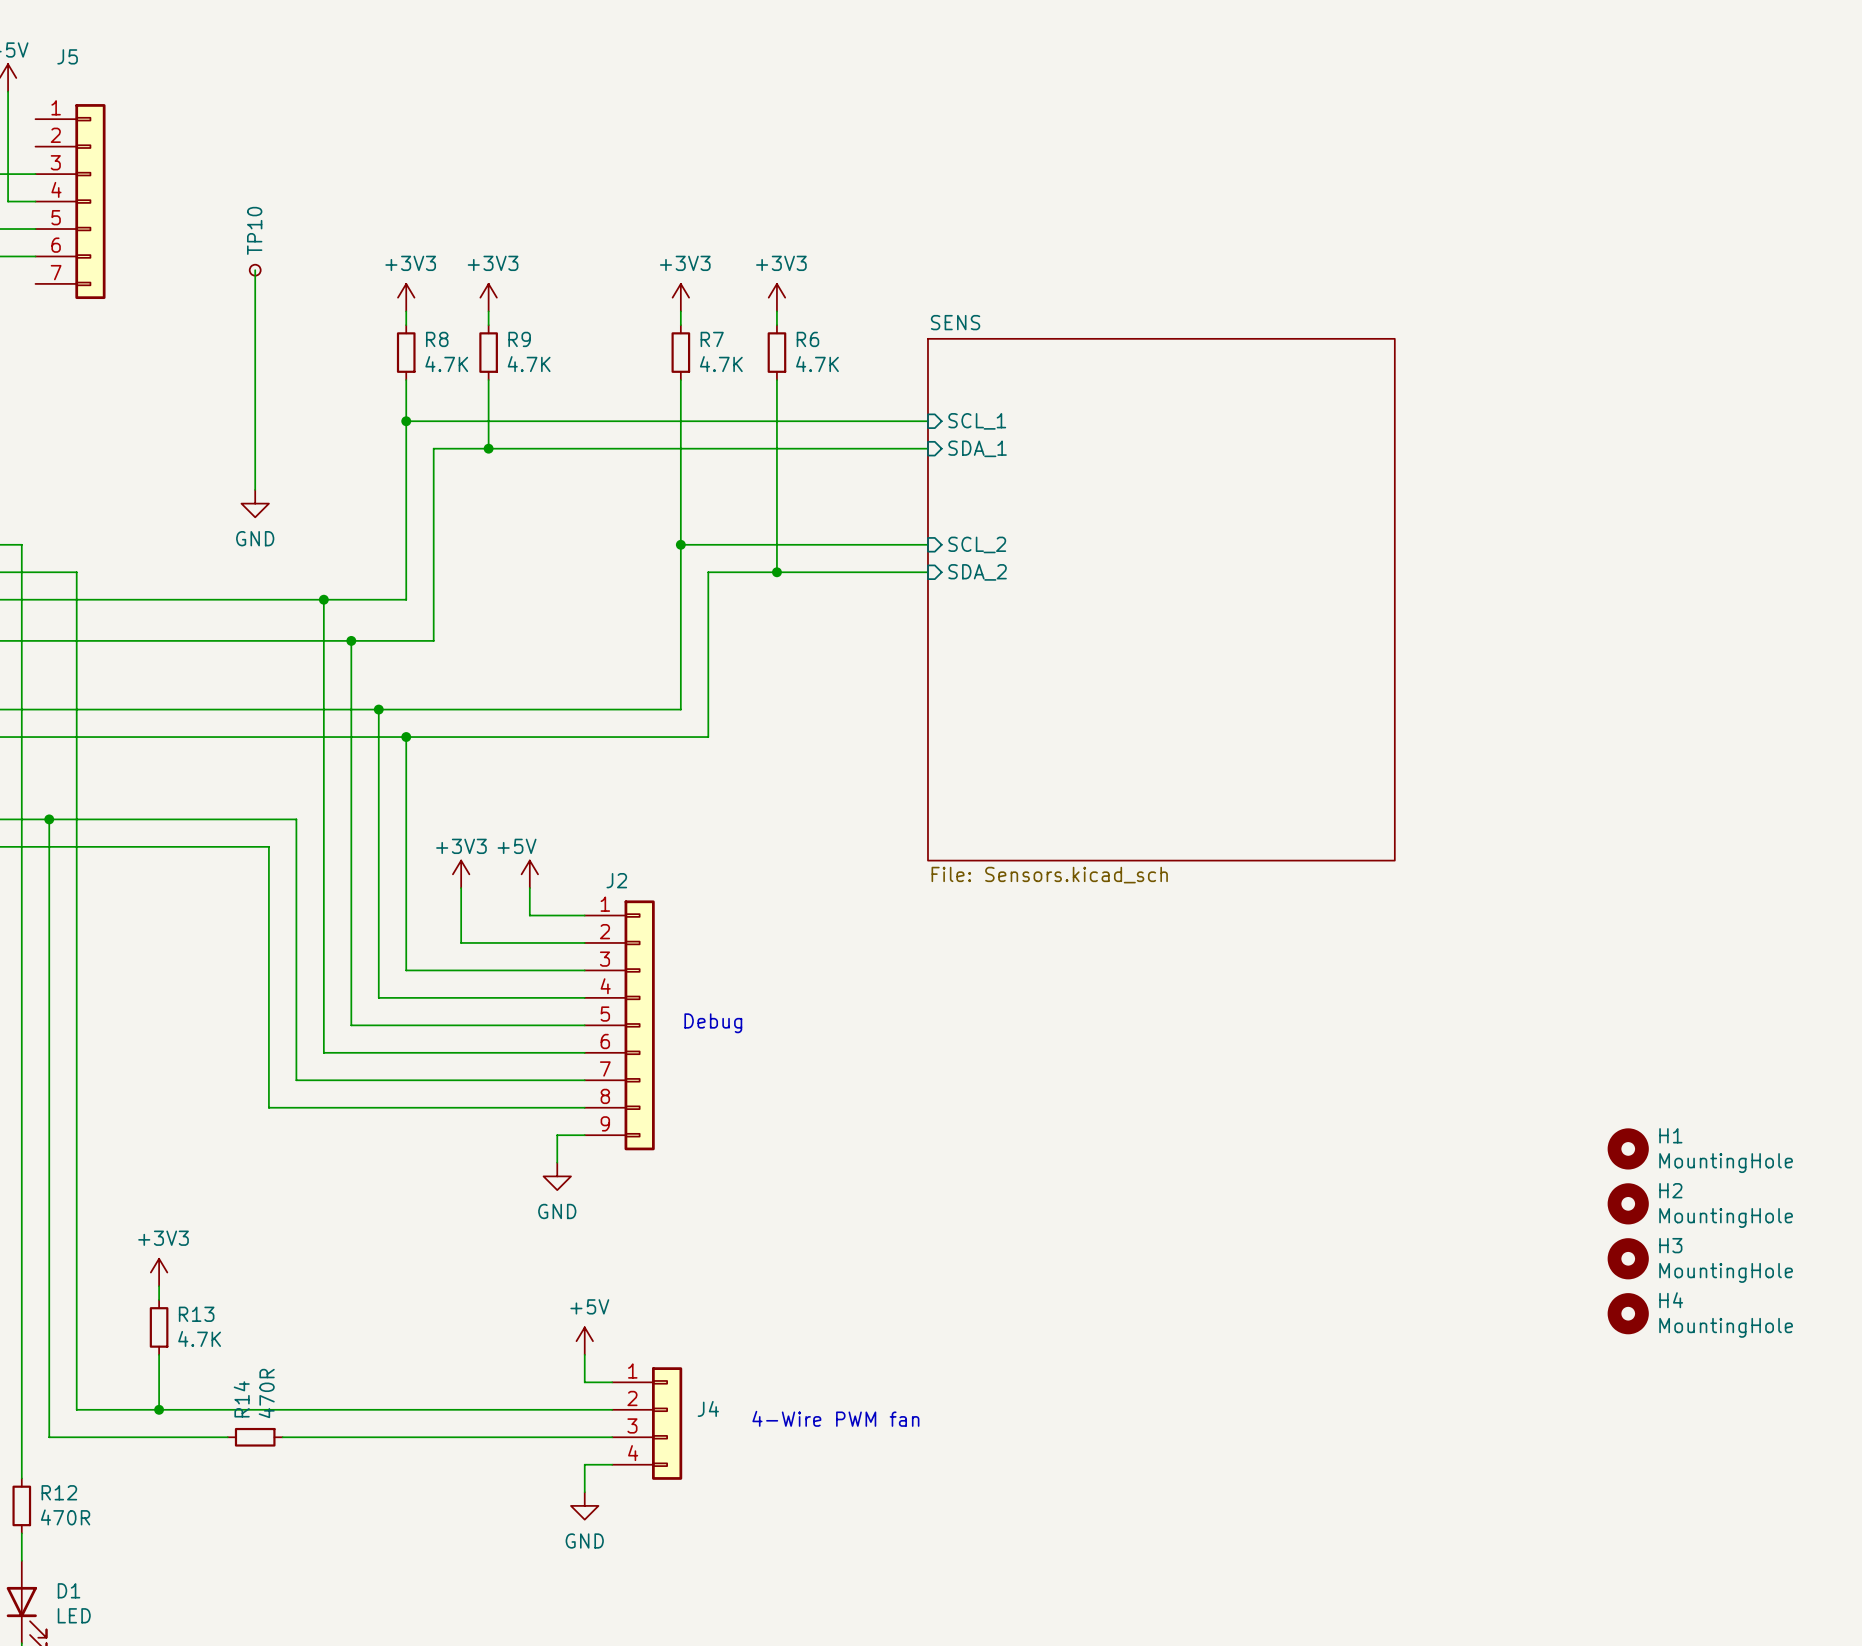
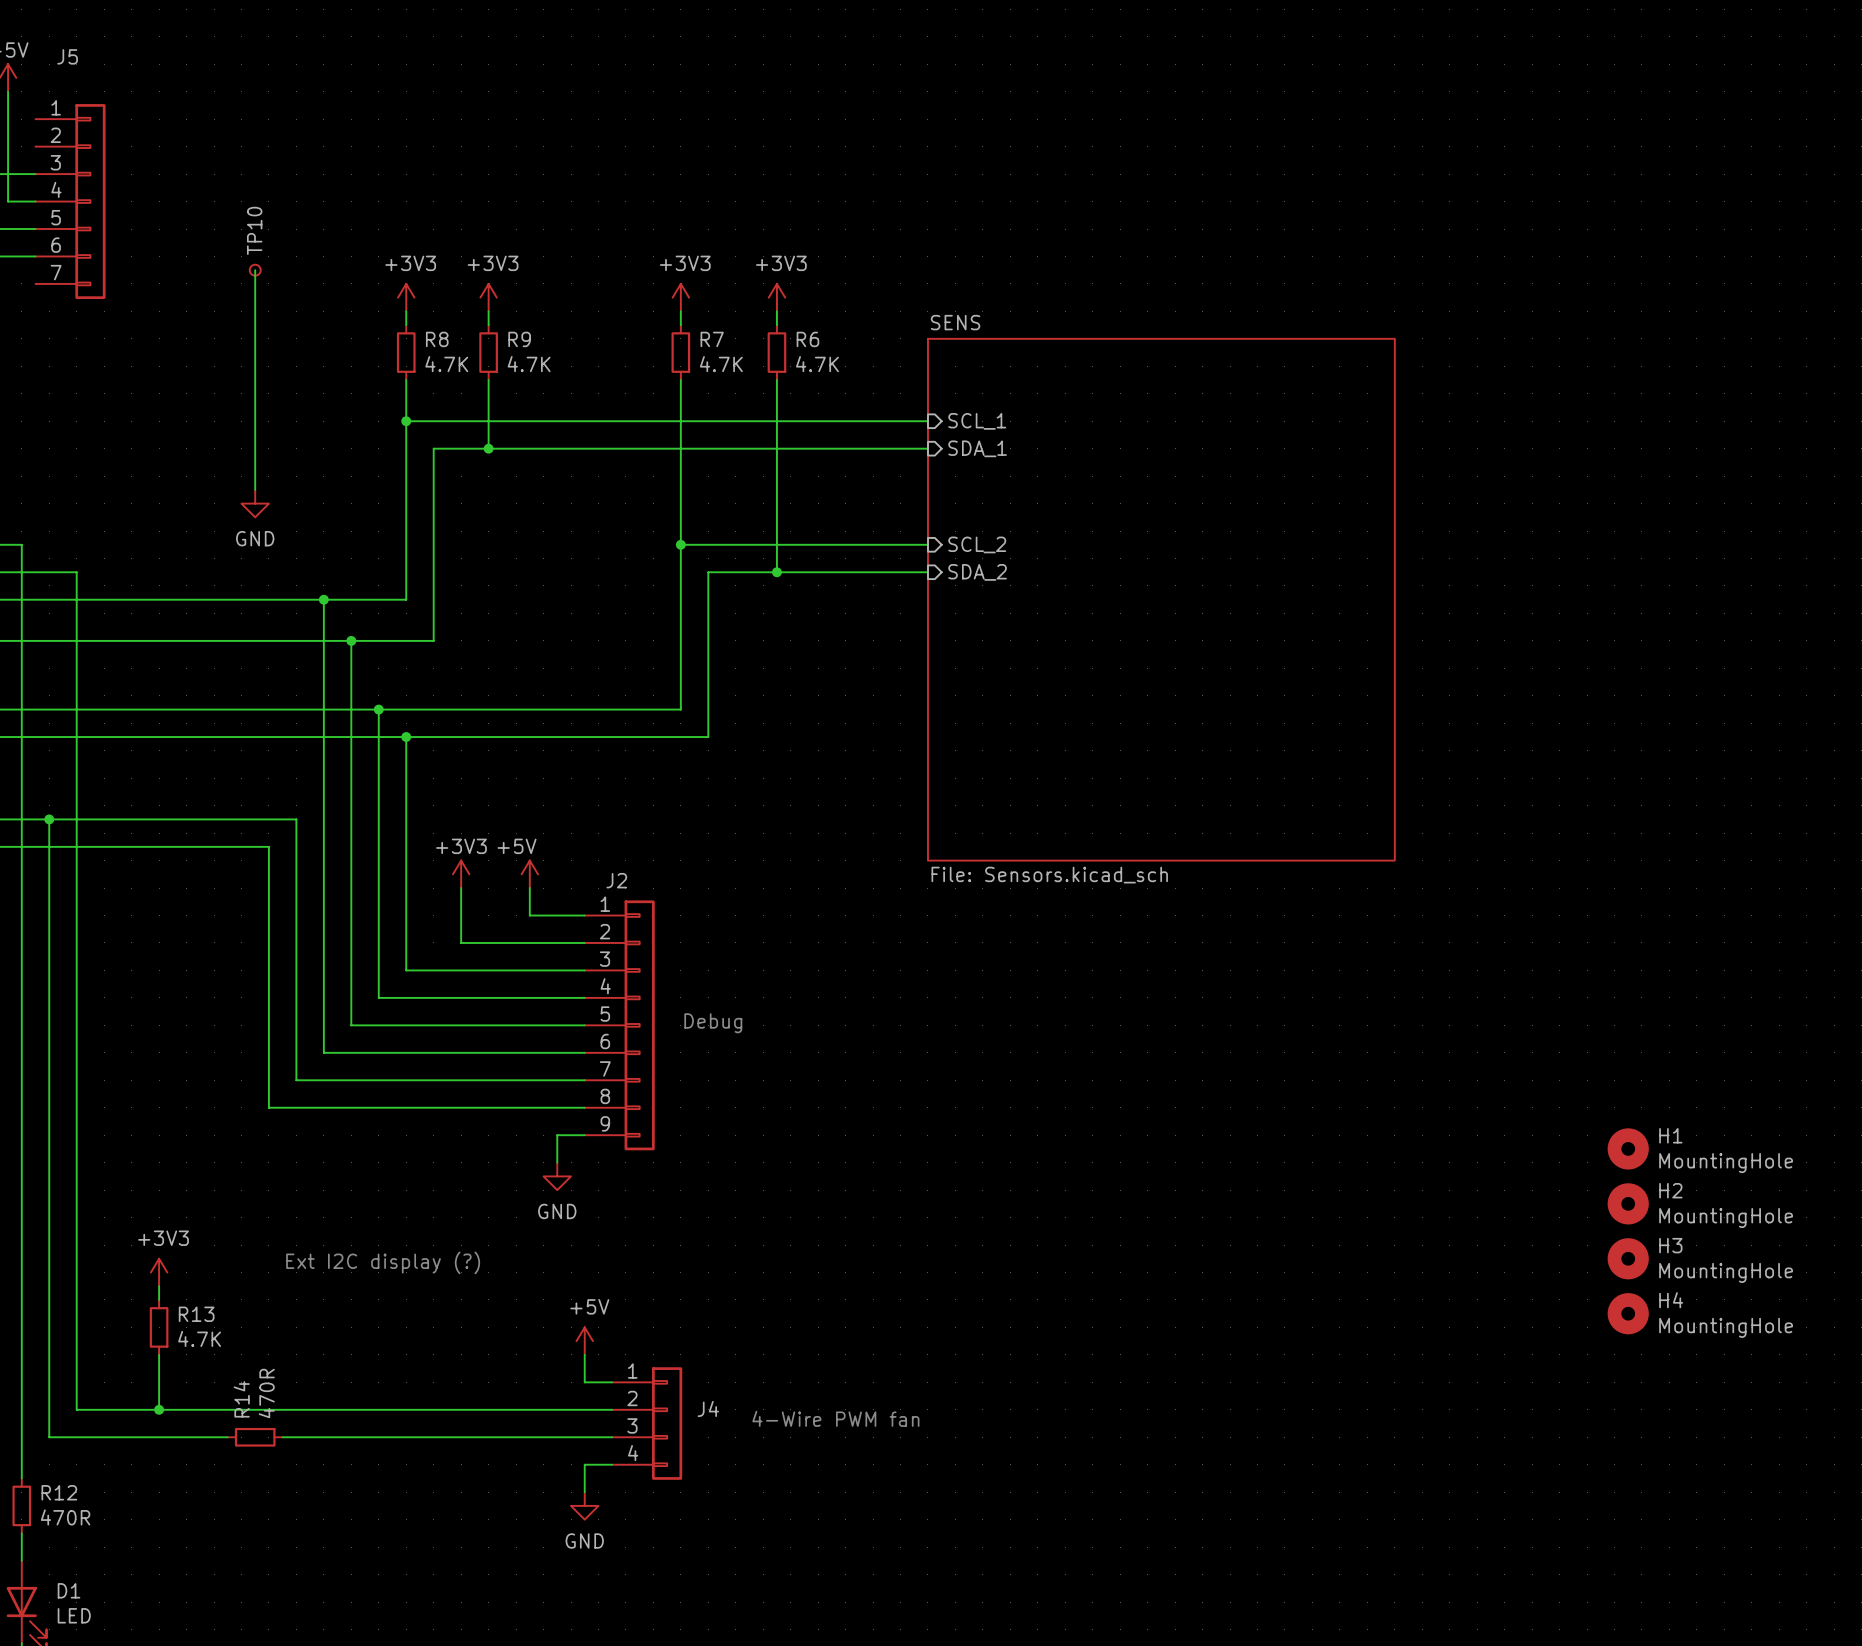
text: none -> Ext I2C display (?) (383, 1262)

